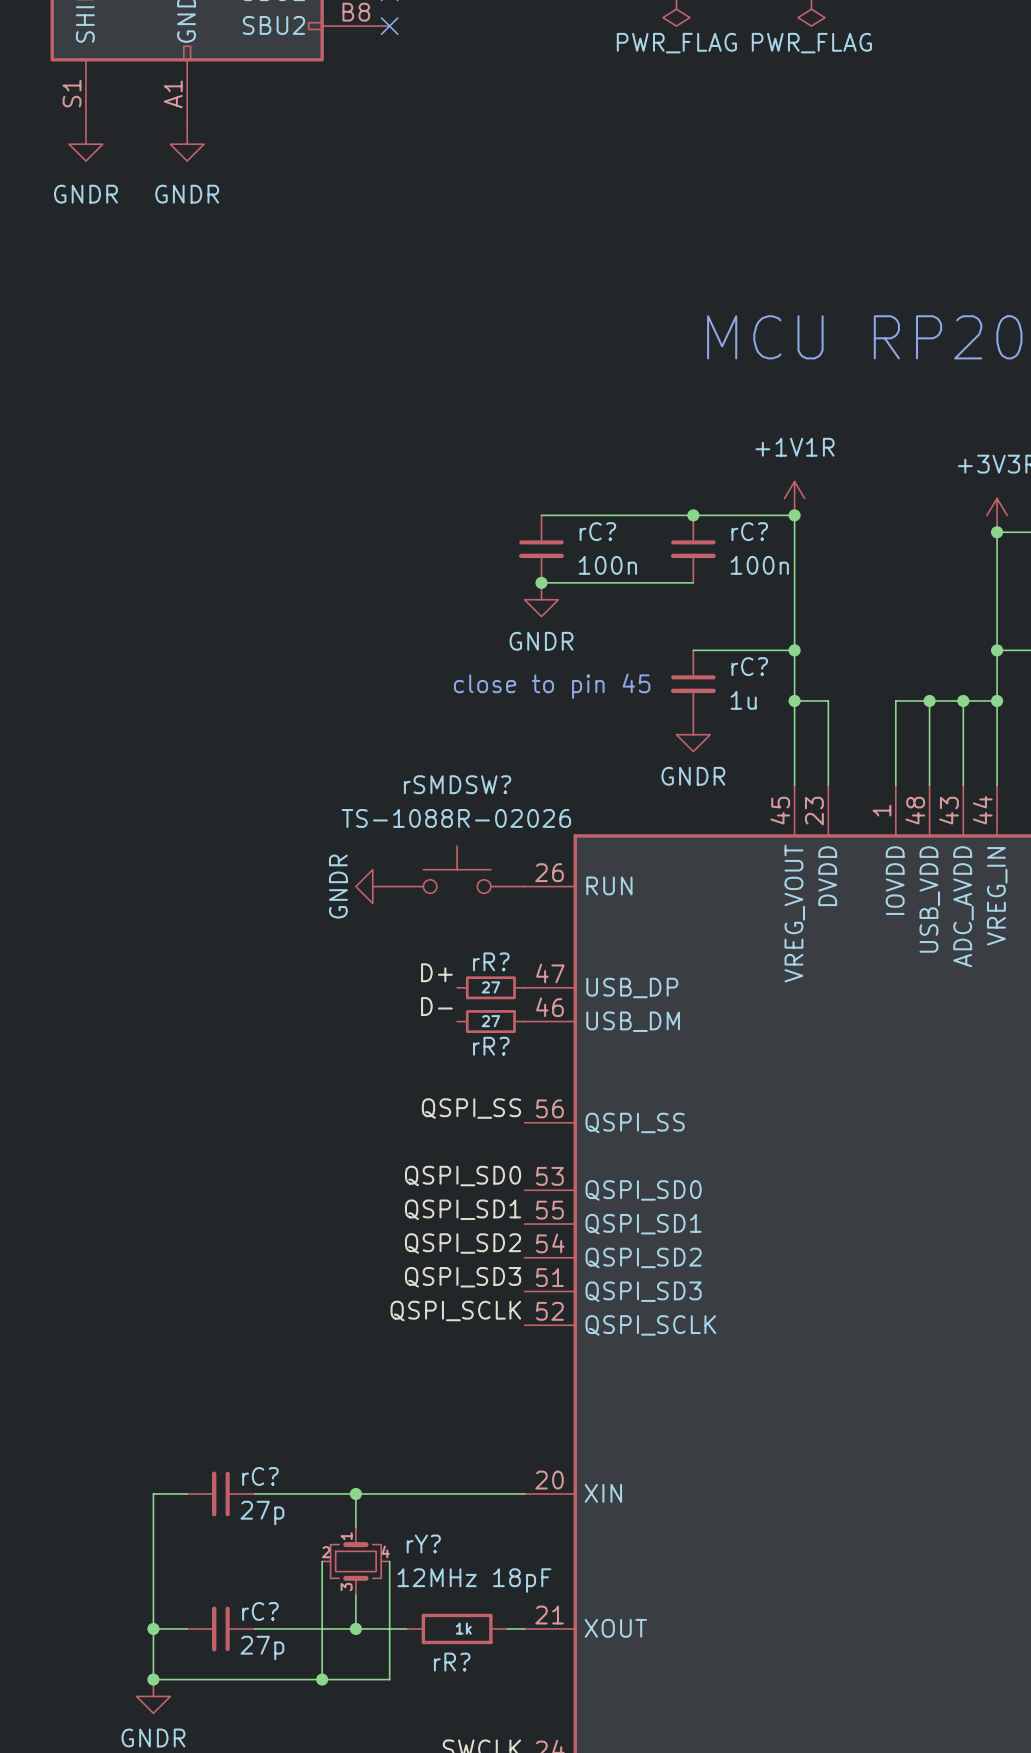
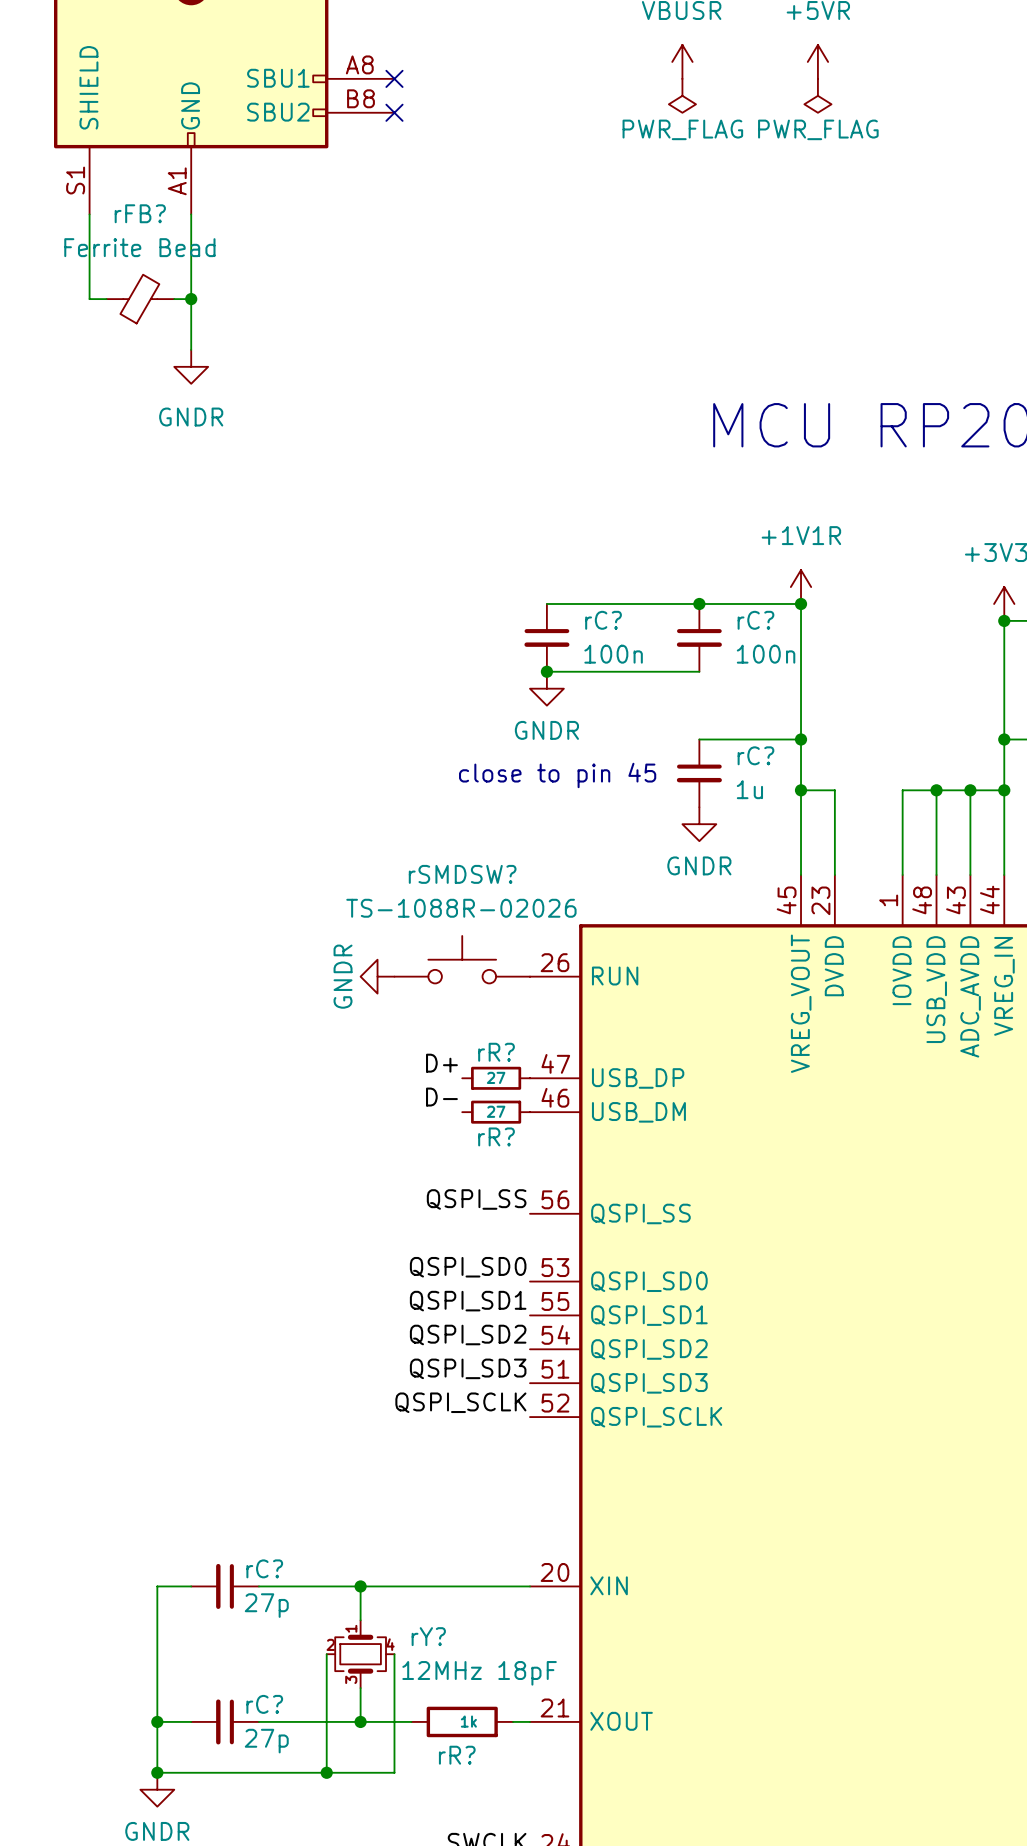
wire: none -> (89, 214) (89, 299) (106, 299)
wire: none -> (191, 214) (191, 349)
power symbol: GNDR (85, 144) -> none
power symbol: GNDR (187, 144) -> none
rFB?: none -> Ferrite Bead (140, 299)
wire: none -> (174, 299) (191, 299)
junction: none -> (191, 299)
power symbol: none -> GNDR (191, 366)

